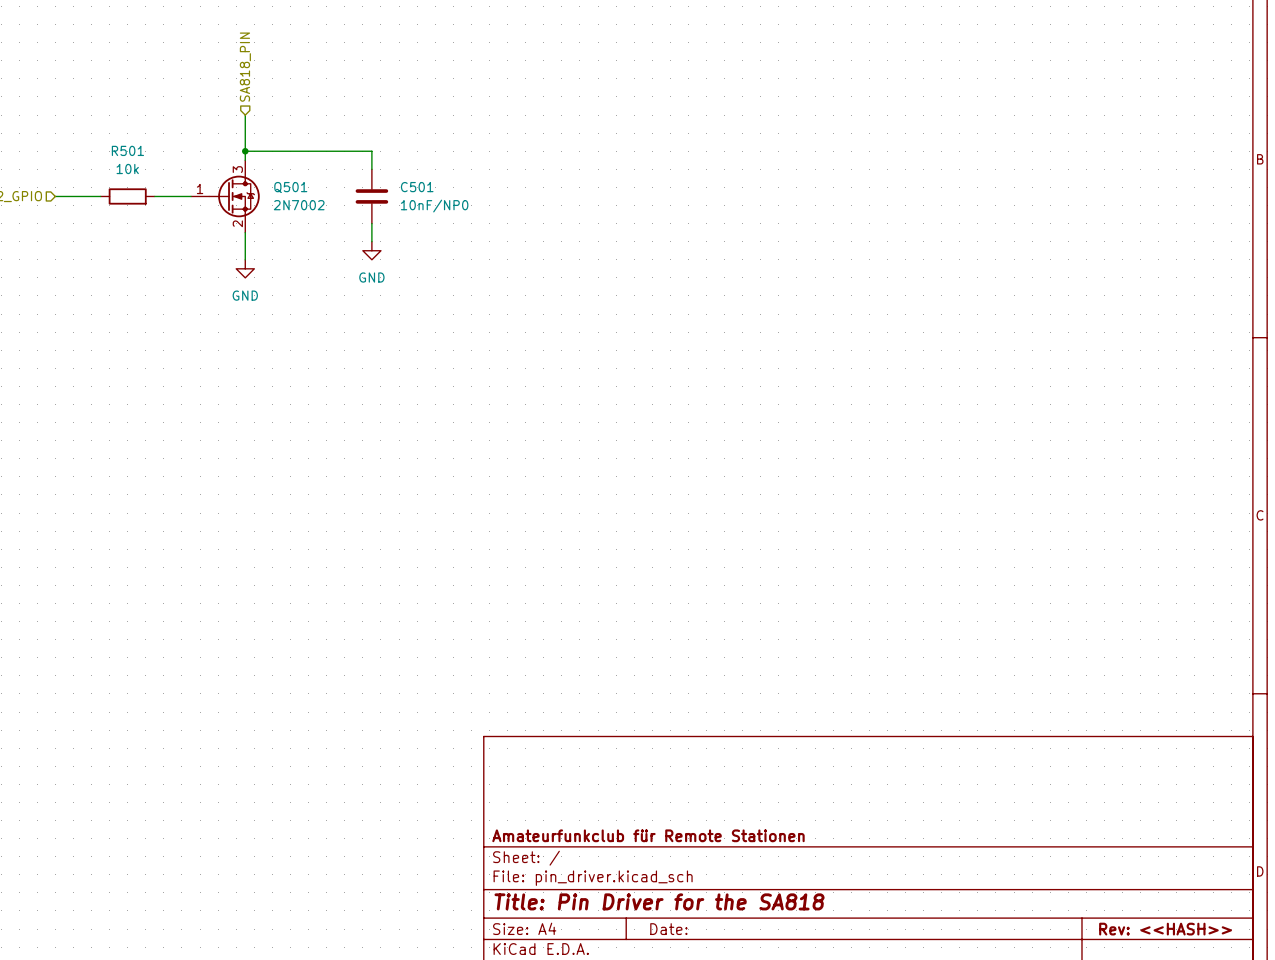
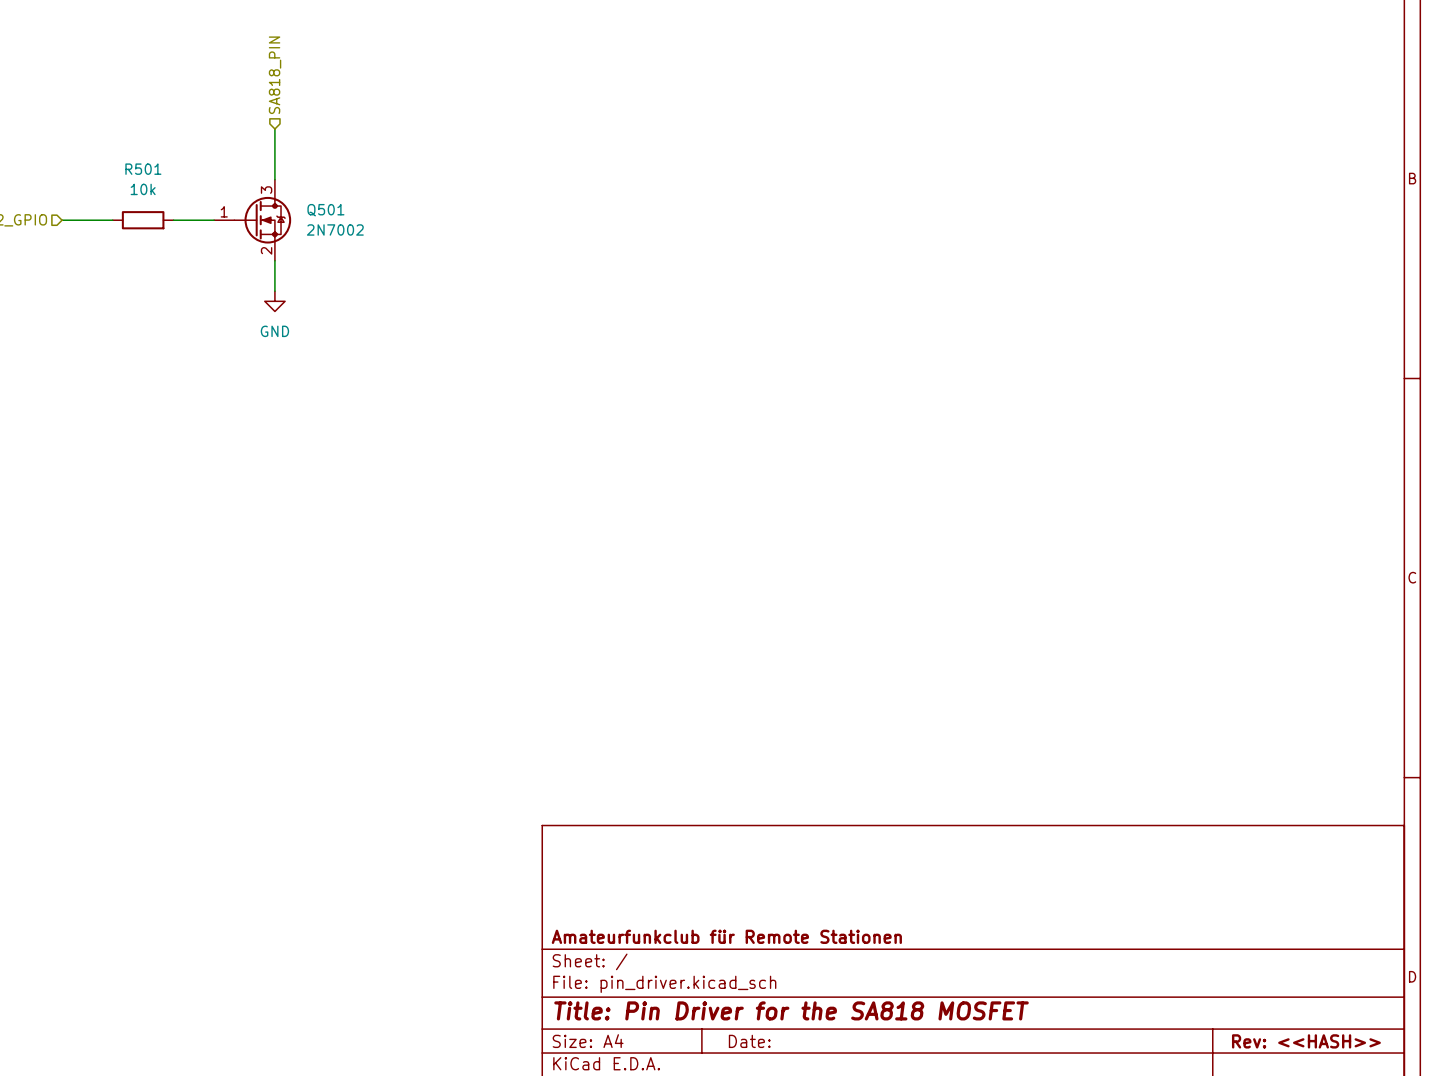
wire: (245, 151) (371, 151) (371, 169) -> none
junction: (245, 151) -> none
C501: 10nF/NP0 (371, 196) -> none
wire: (371, 223) (371, 241) -> none
power symbol: GND (371, 250) -> none
title block: Title: Pin Driver for the SA818 (659, 901) -> Title: Pin Driver for the SA818 MOSFET (791, 1010)

